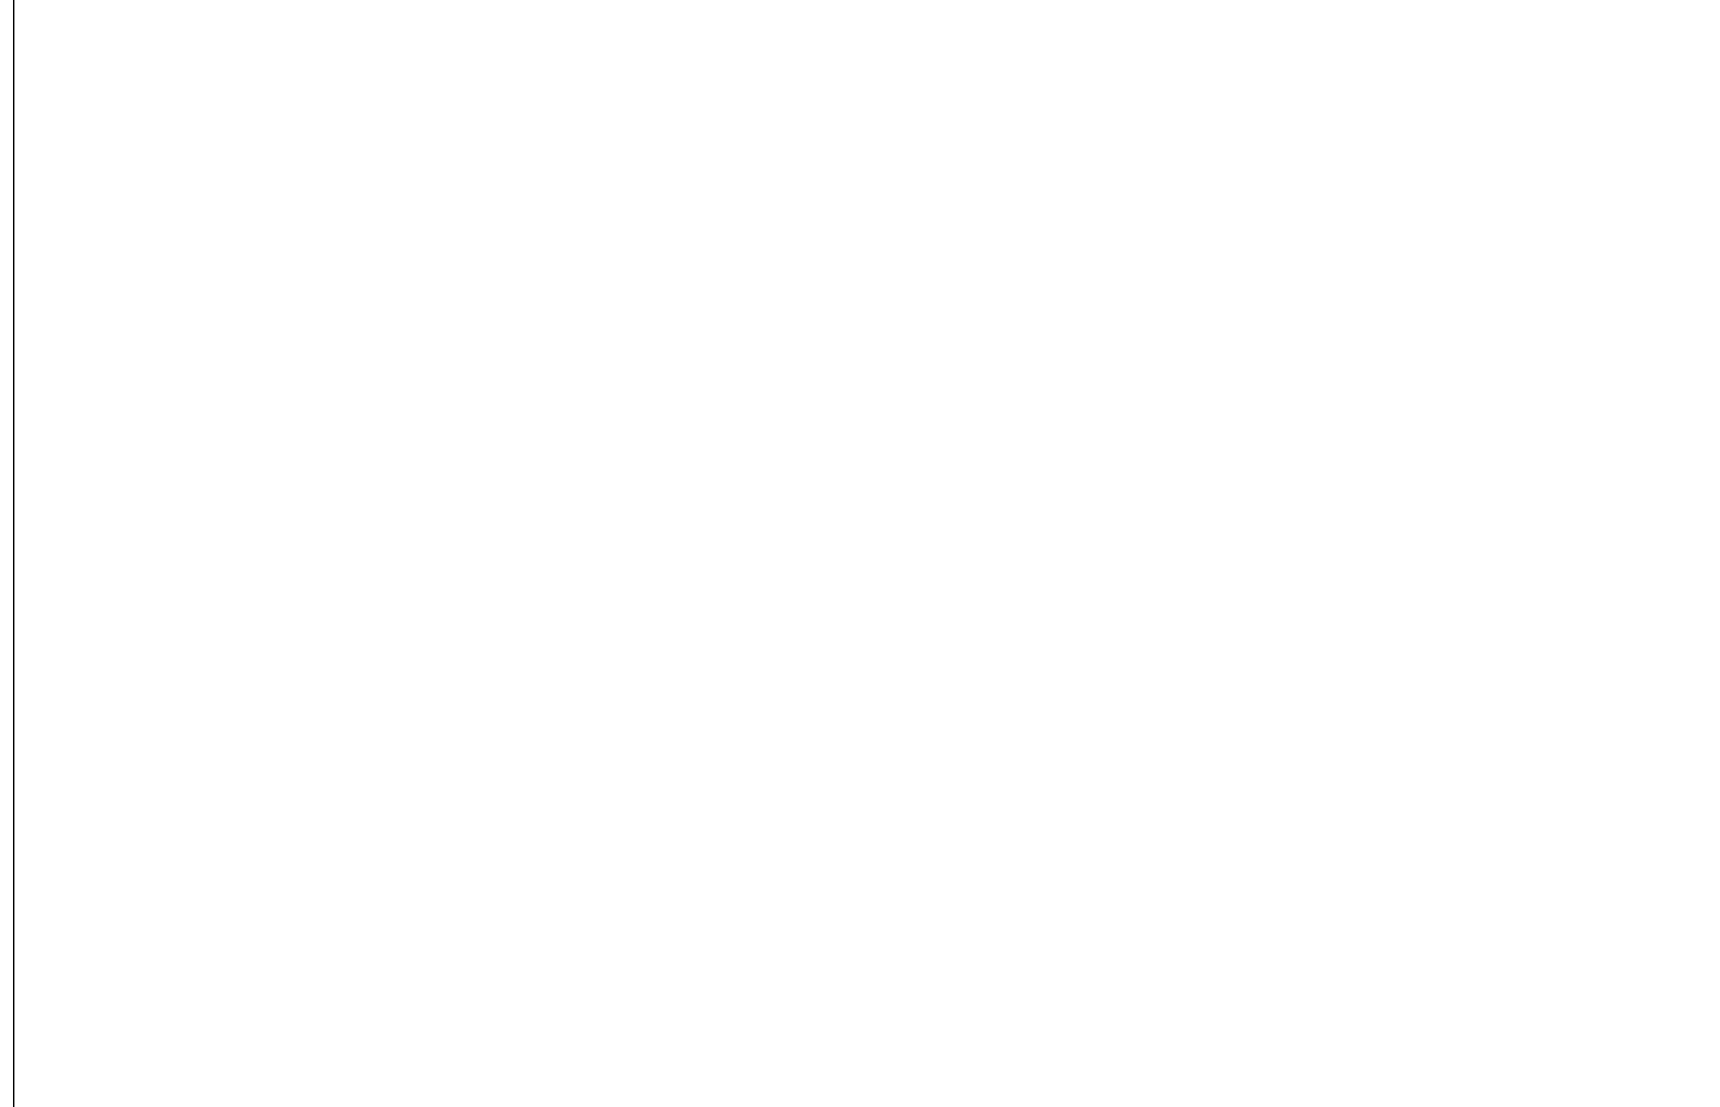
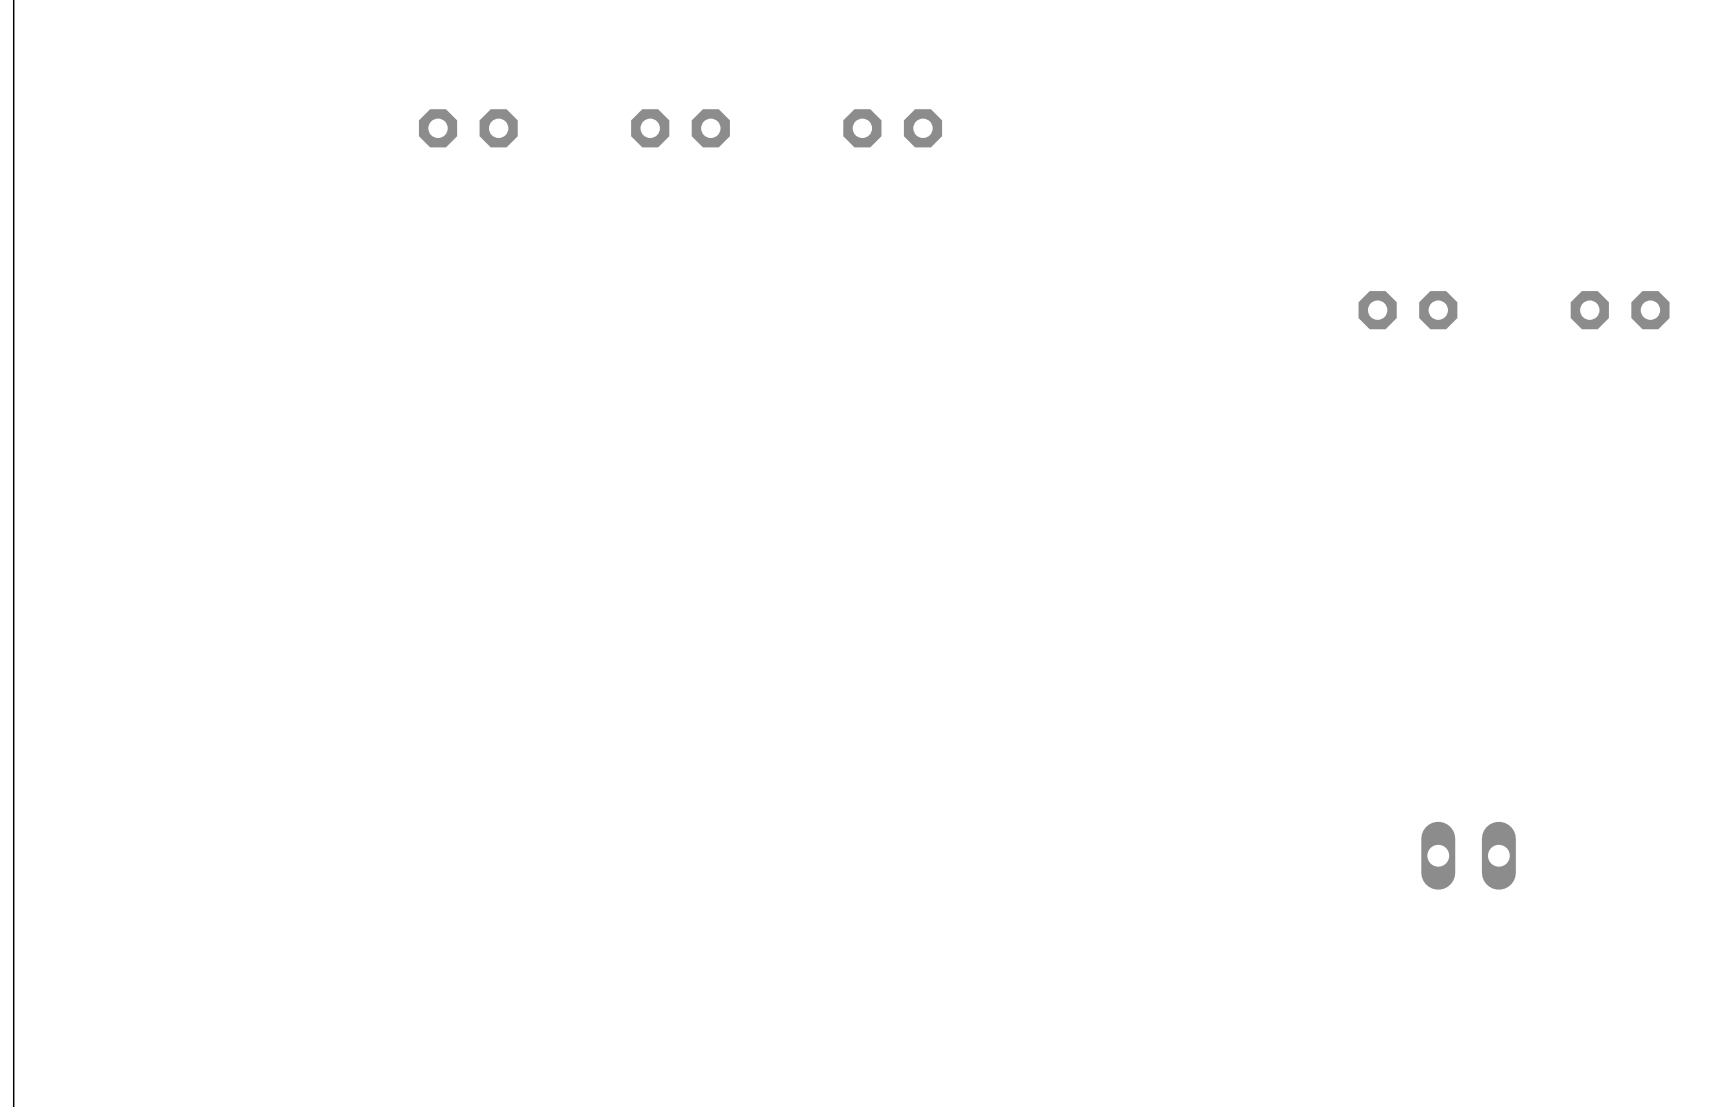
part: none -> (468, 128)
part: none -> (680, 128)
part: none -> (892, 128)
part: none -> (1407, 310)
part: none -> (1620, 310)
part: none -> (1468, 855)

